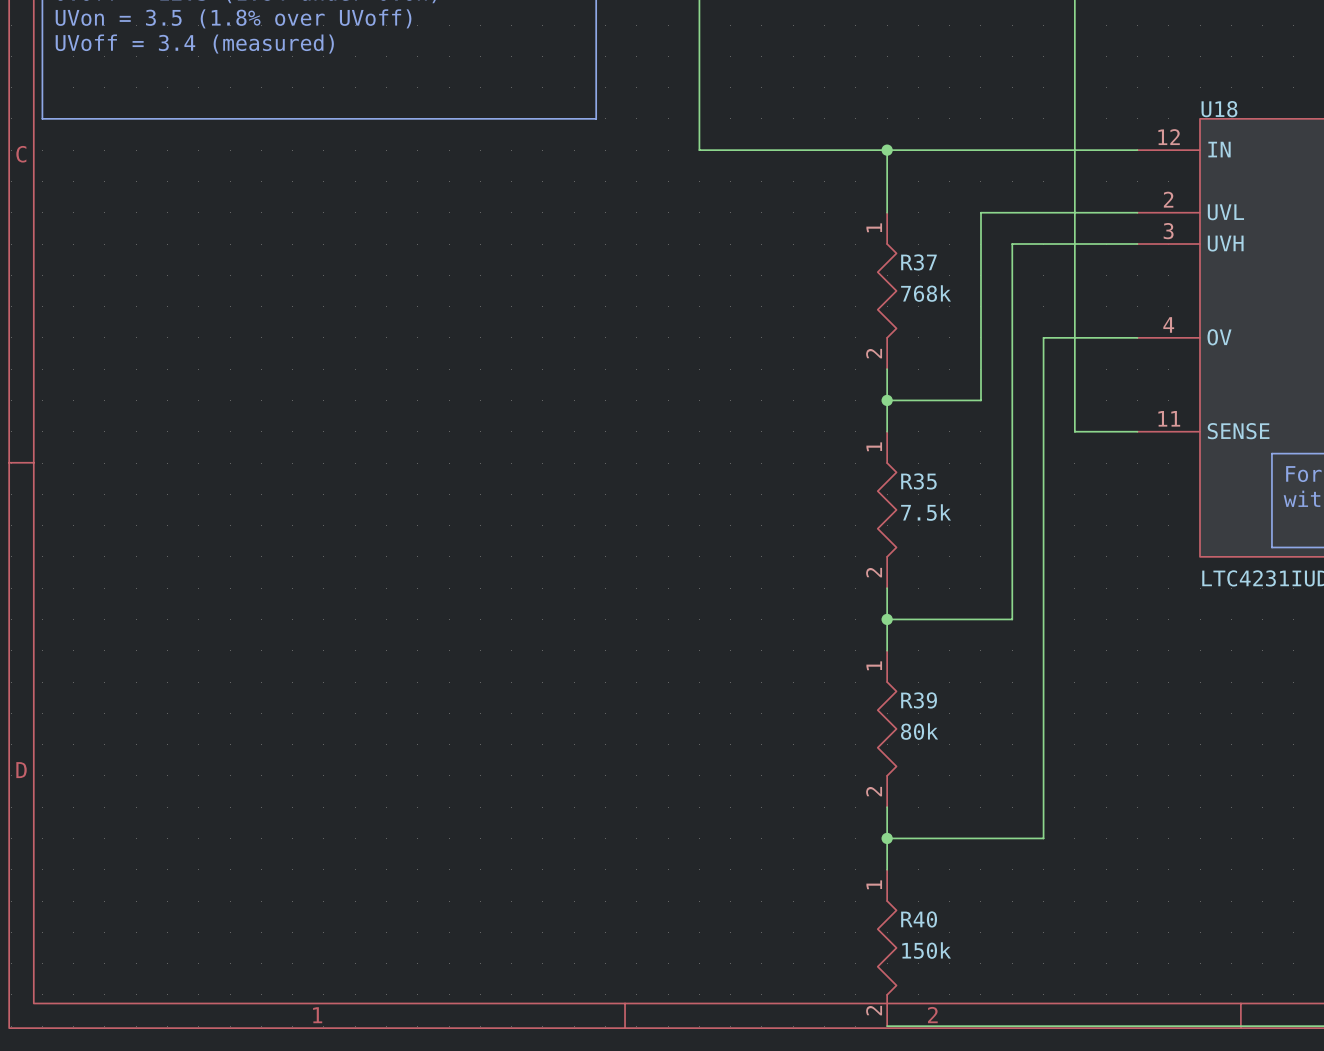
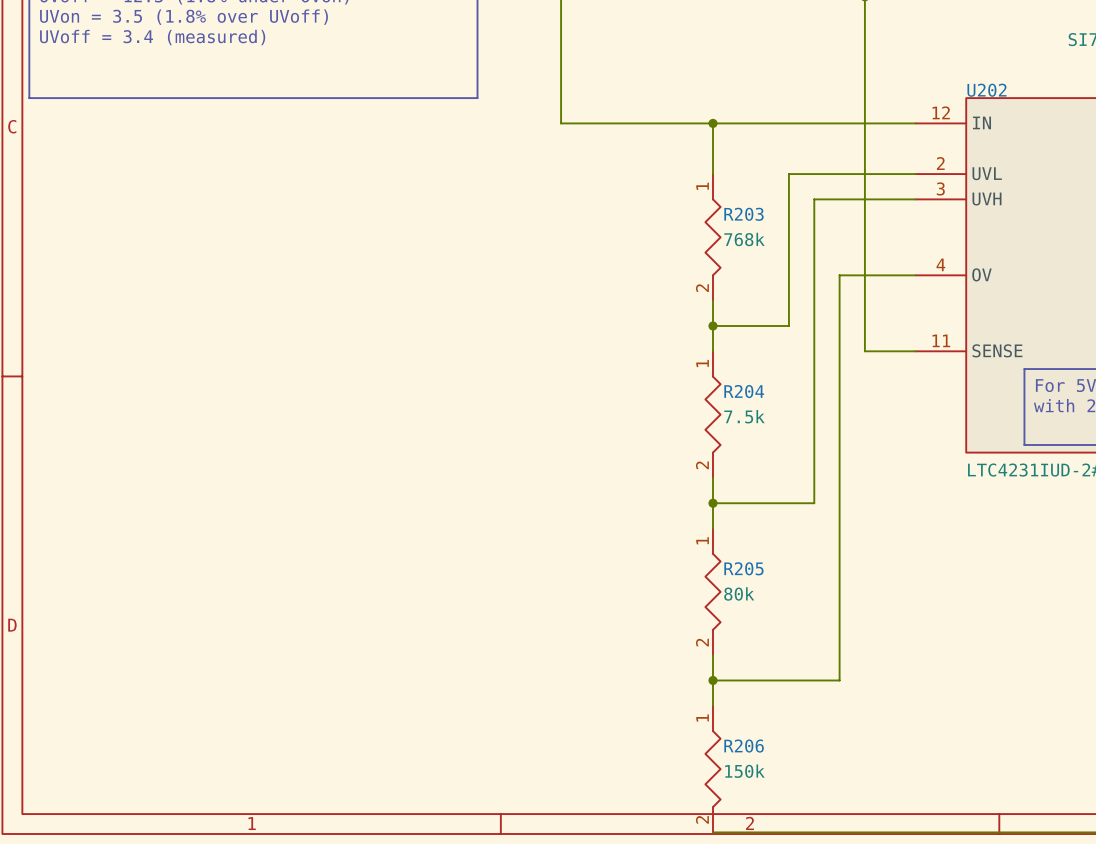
U18 name: U18 (1219, 109) -> U202 (987, 90)
R37 name: R37 (918, 262) -> R203 (743, 214)
R35 name: R35 (918, 481) -> R204 (744, 391)
R39 name: R39 (919, 700) -> R205 (743, 568)
R40 name: R40 (919, 919) -> R206 (744, 746)

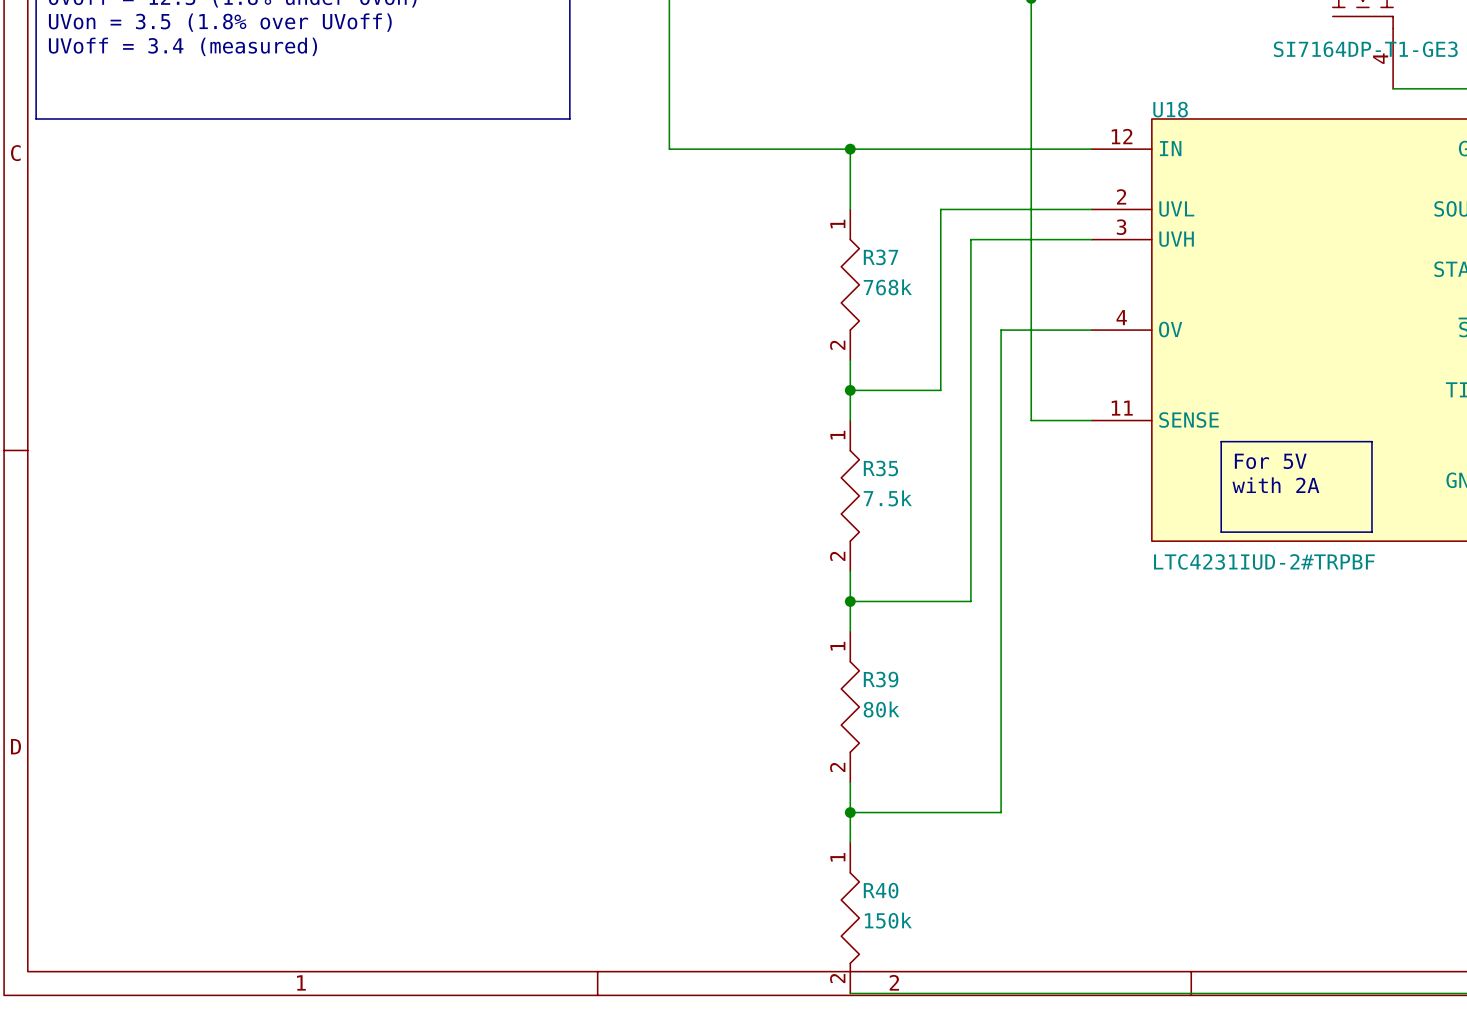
U202 name: U202 (987, 90) -> U18 (1170, 109)
R203 name: R203 (743, 214) -> R37 (880, 257)
R204 name: R204 (744, 391) -> R35 (880, 468)
R205 name: R205 (743, 568) -> R39 (881, 679)
R206 name: R206 (744, 746) -> R40 (881, 890)

